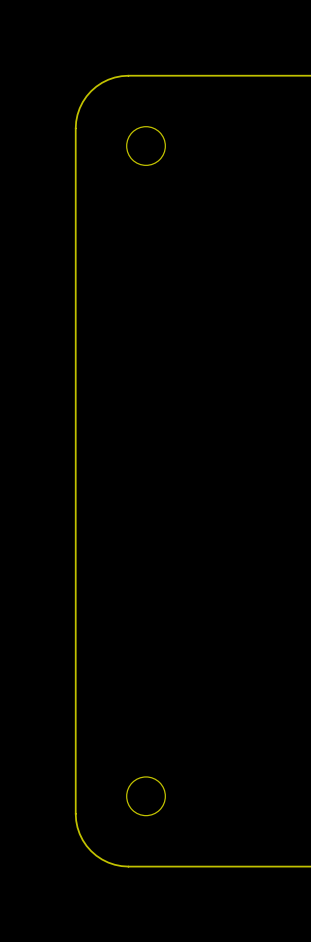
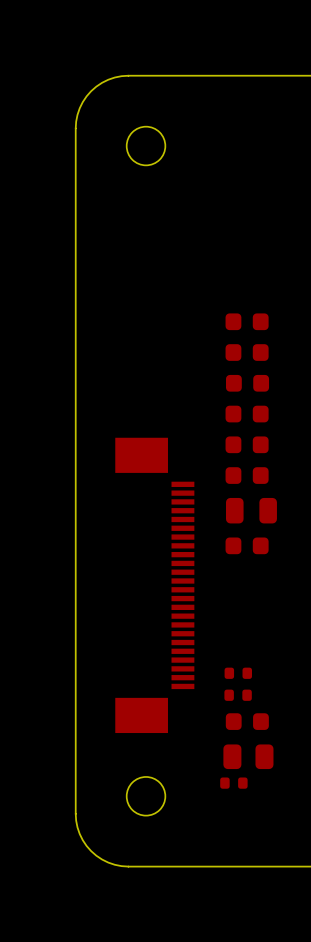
part: none -> (247, 321)
part: none -> (247, 352)
part: none -> (247, 383)
part: none -> (247, 414)
part: none -> (247, 444)
part: none -> (247, 475)
part: none -> (251, 510)
part: none -> (247, 545)
part: none -> (154, 585)
part: none -> (238, 673)
part: none -> (238, 695)
part: none -> (247, 721)
part: none -> (248, 756)
part: none -> (233, 783)

